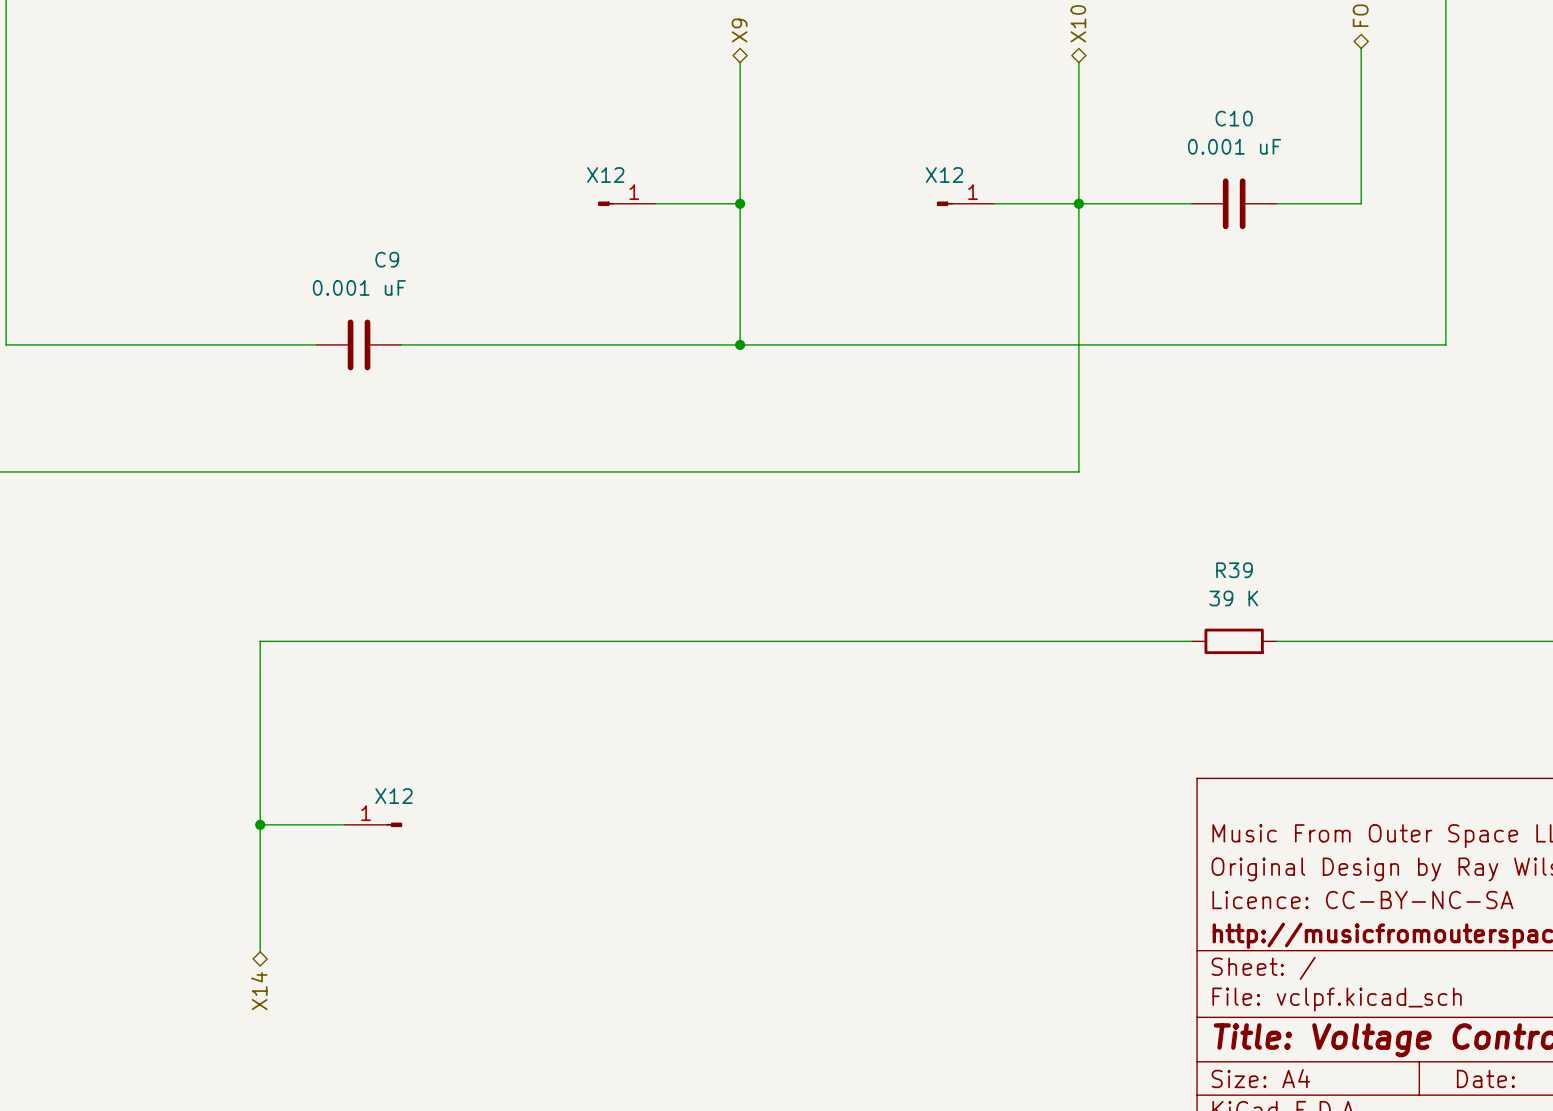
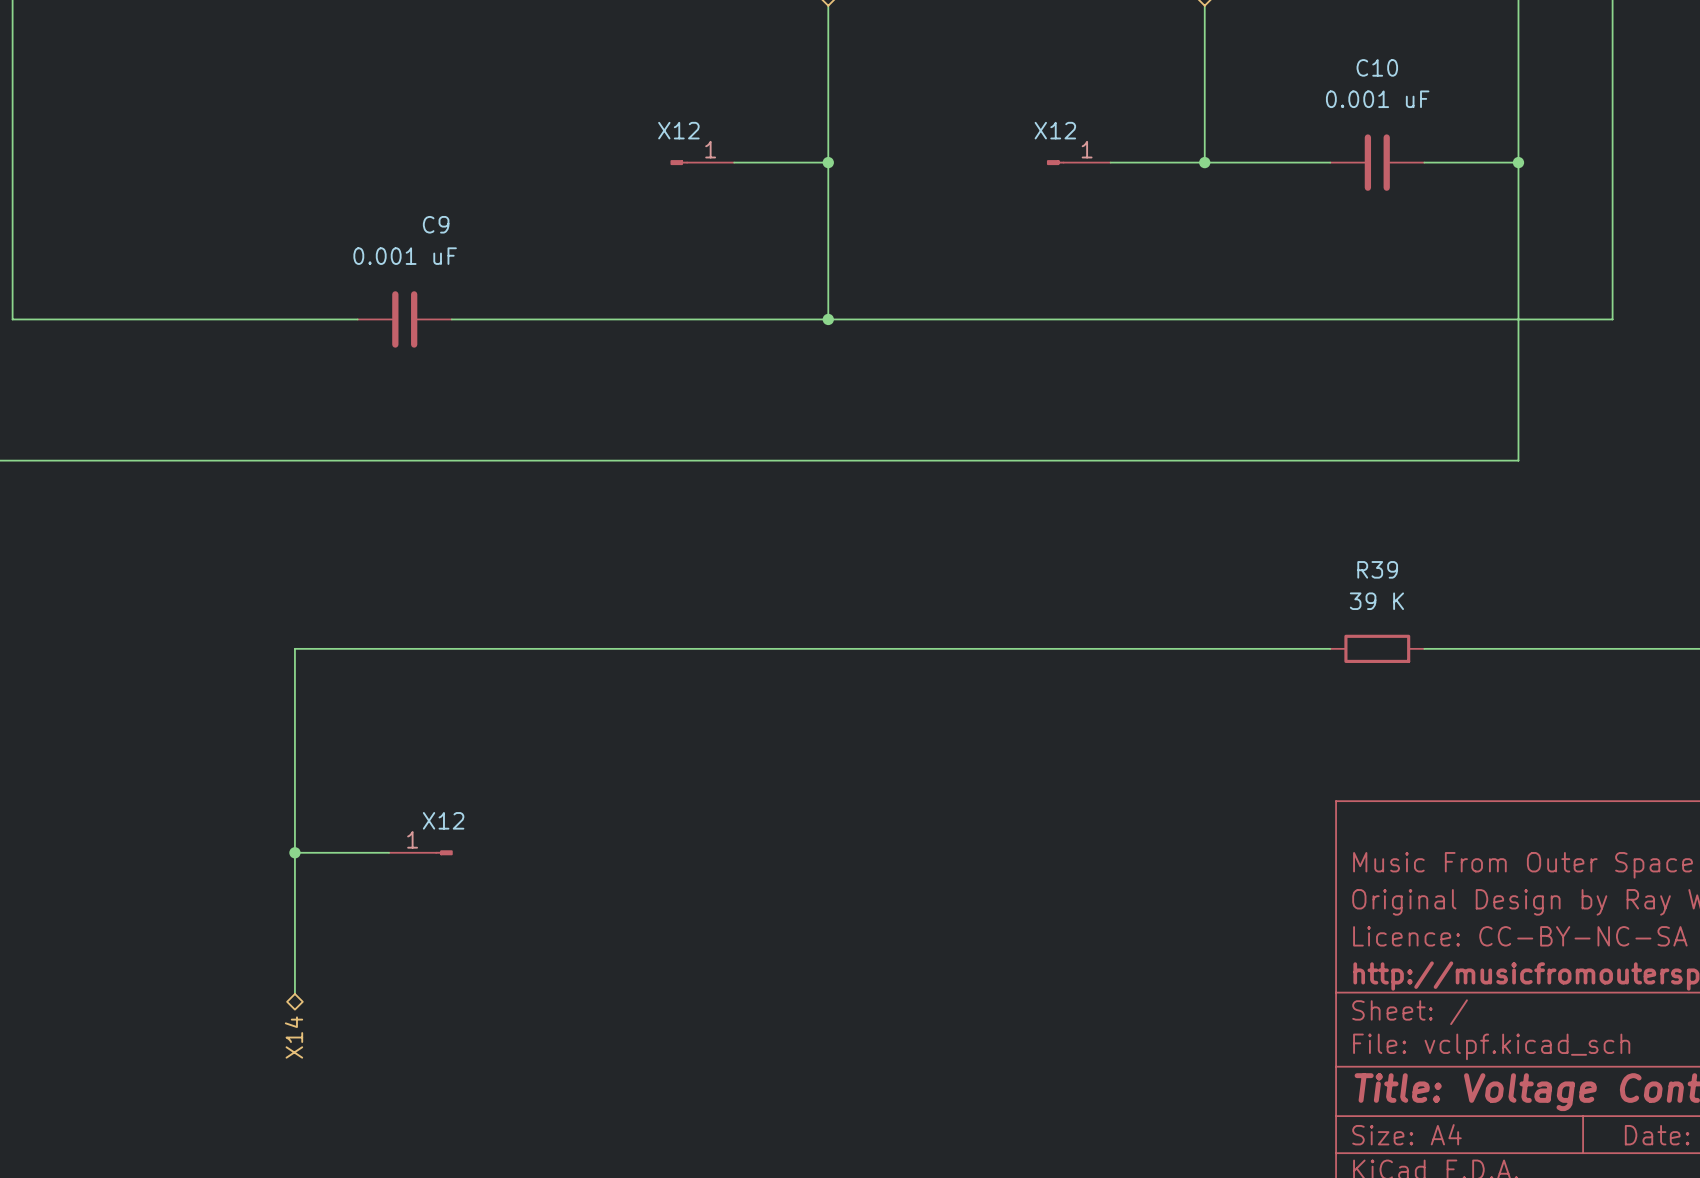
wire: (1078, 203) (1078, 471) -> (1518, 162) (1518, 460) (1204, 460)
junction: none -> (1518, 162)

